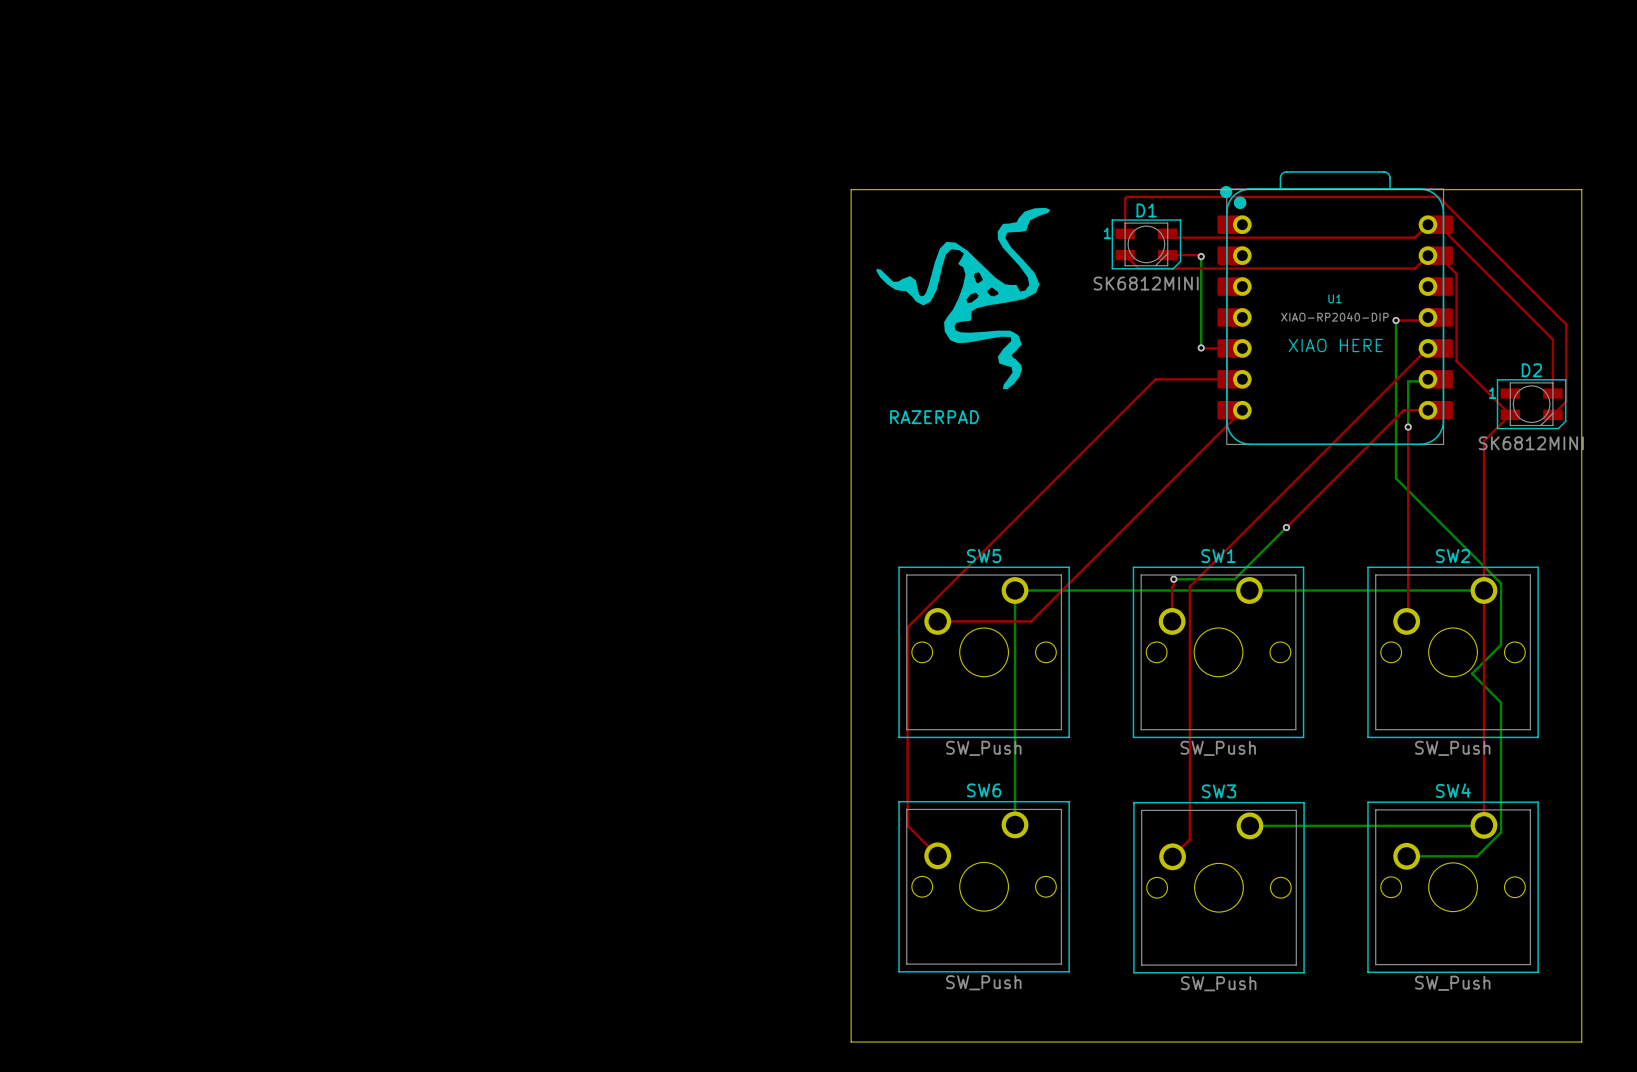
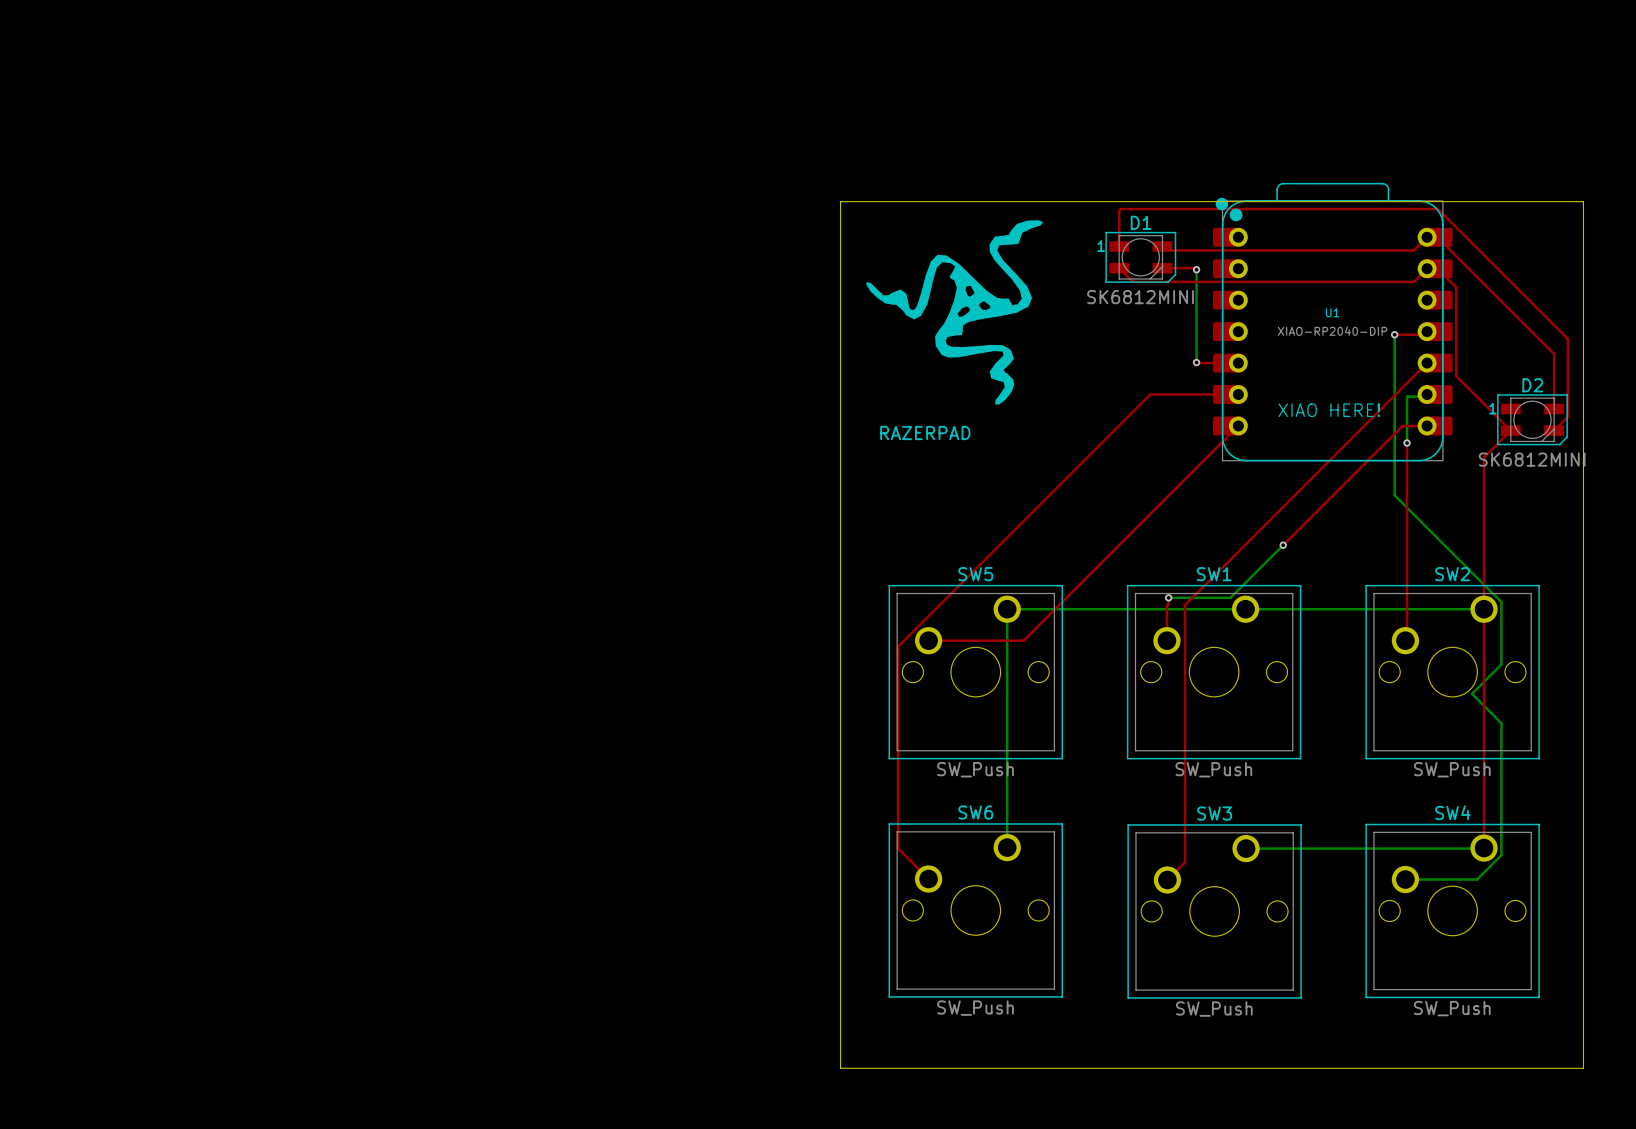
text: XIAO HERE (1335, 345) -> none
text: none -> XIAO HERE! (1329, 410)

